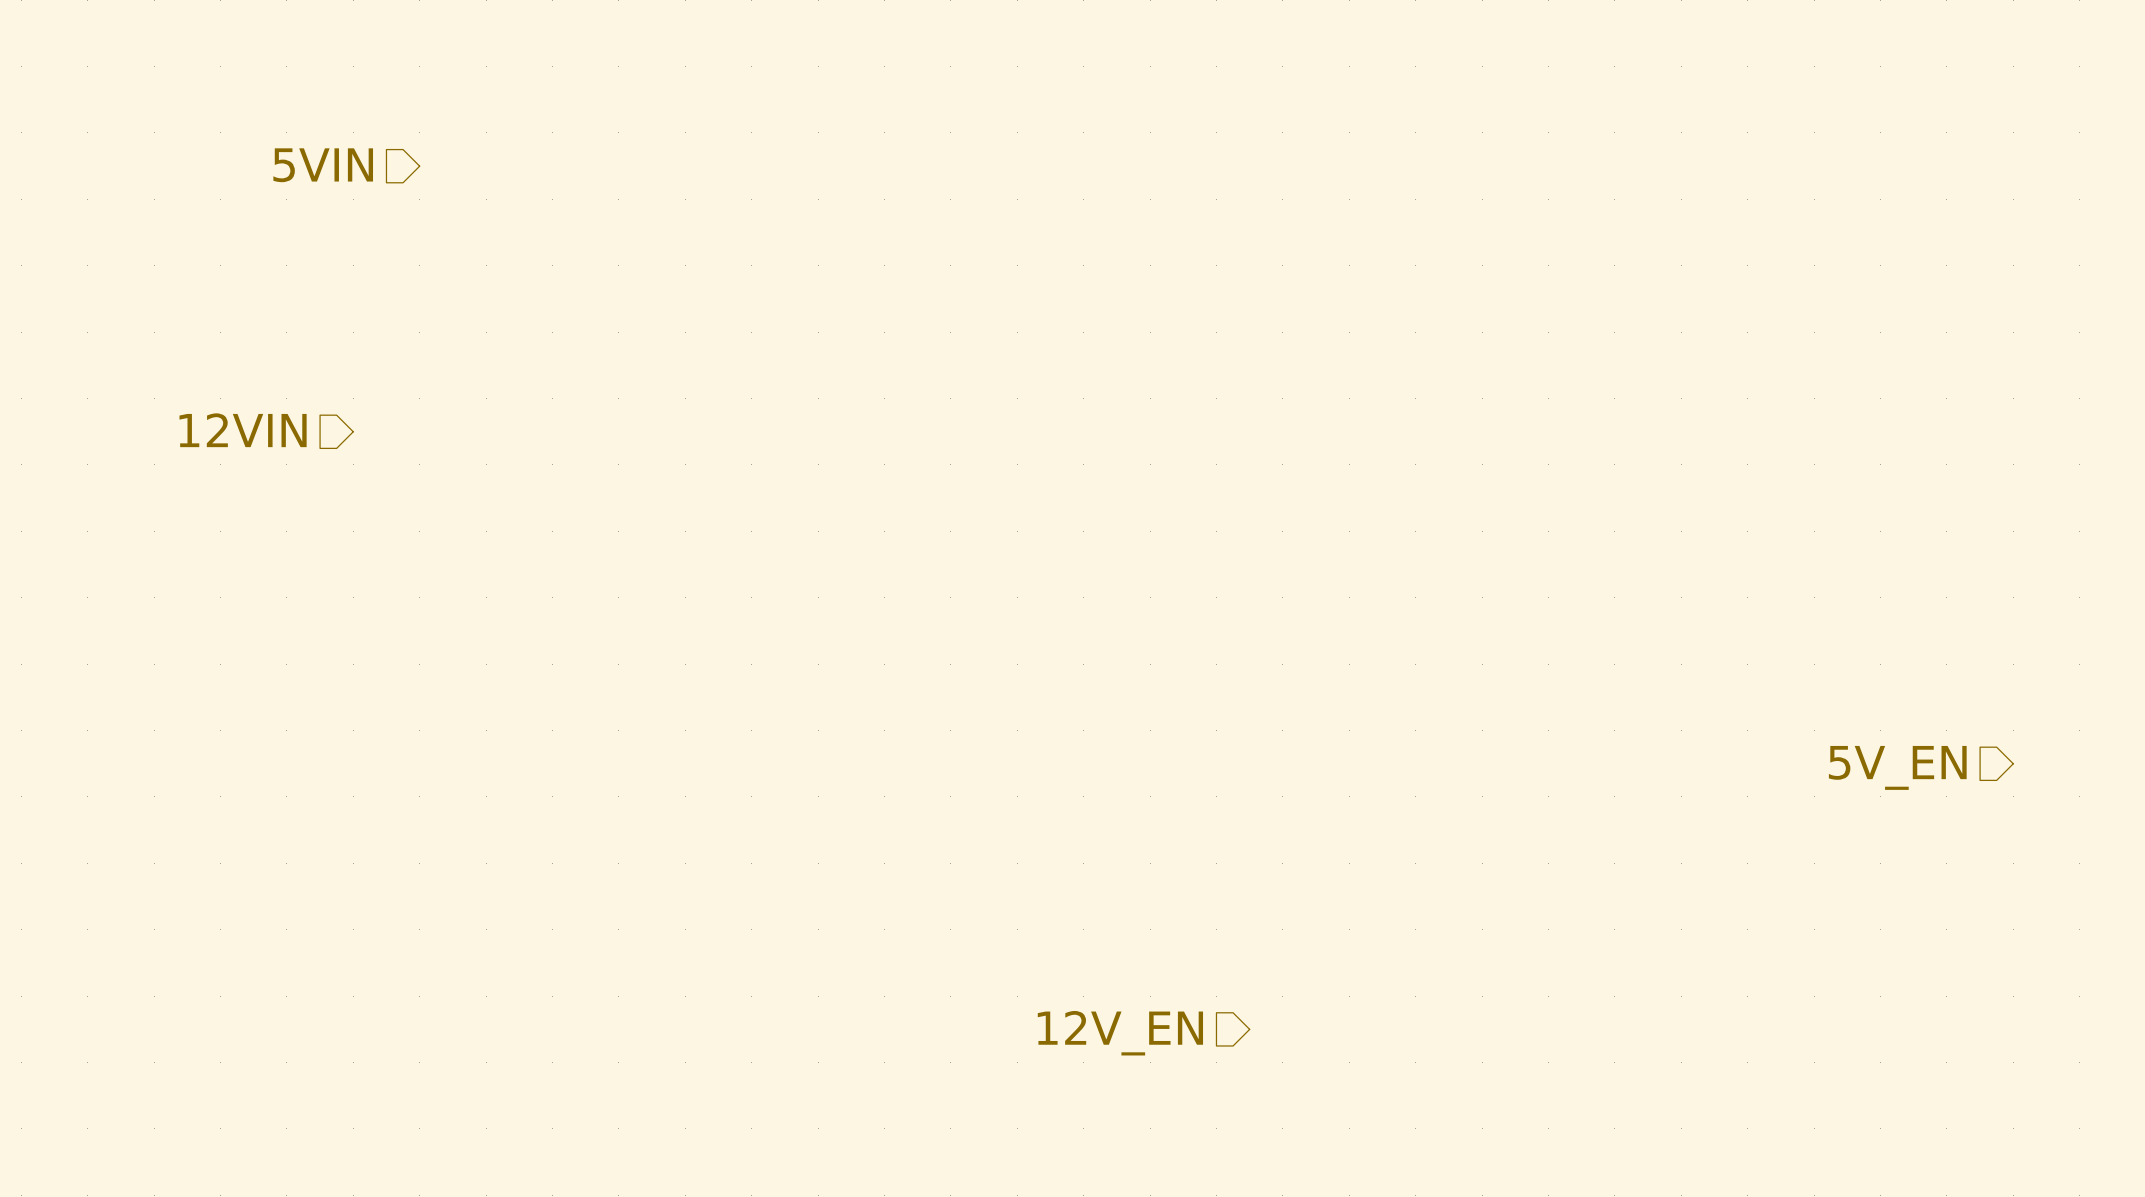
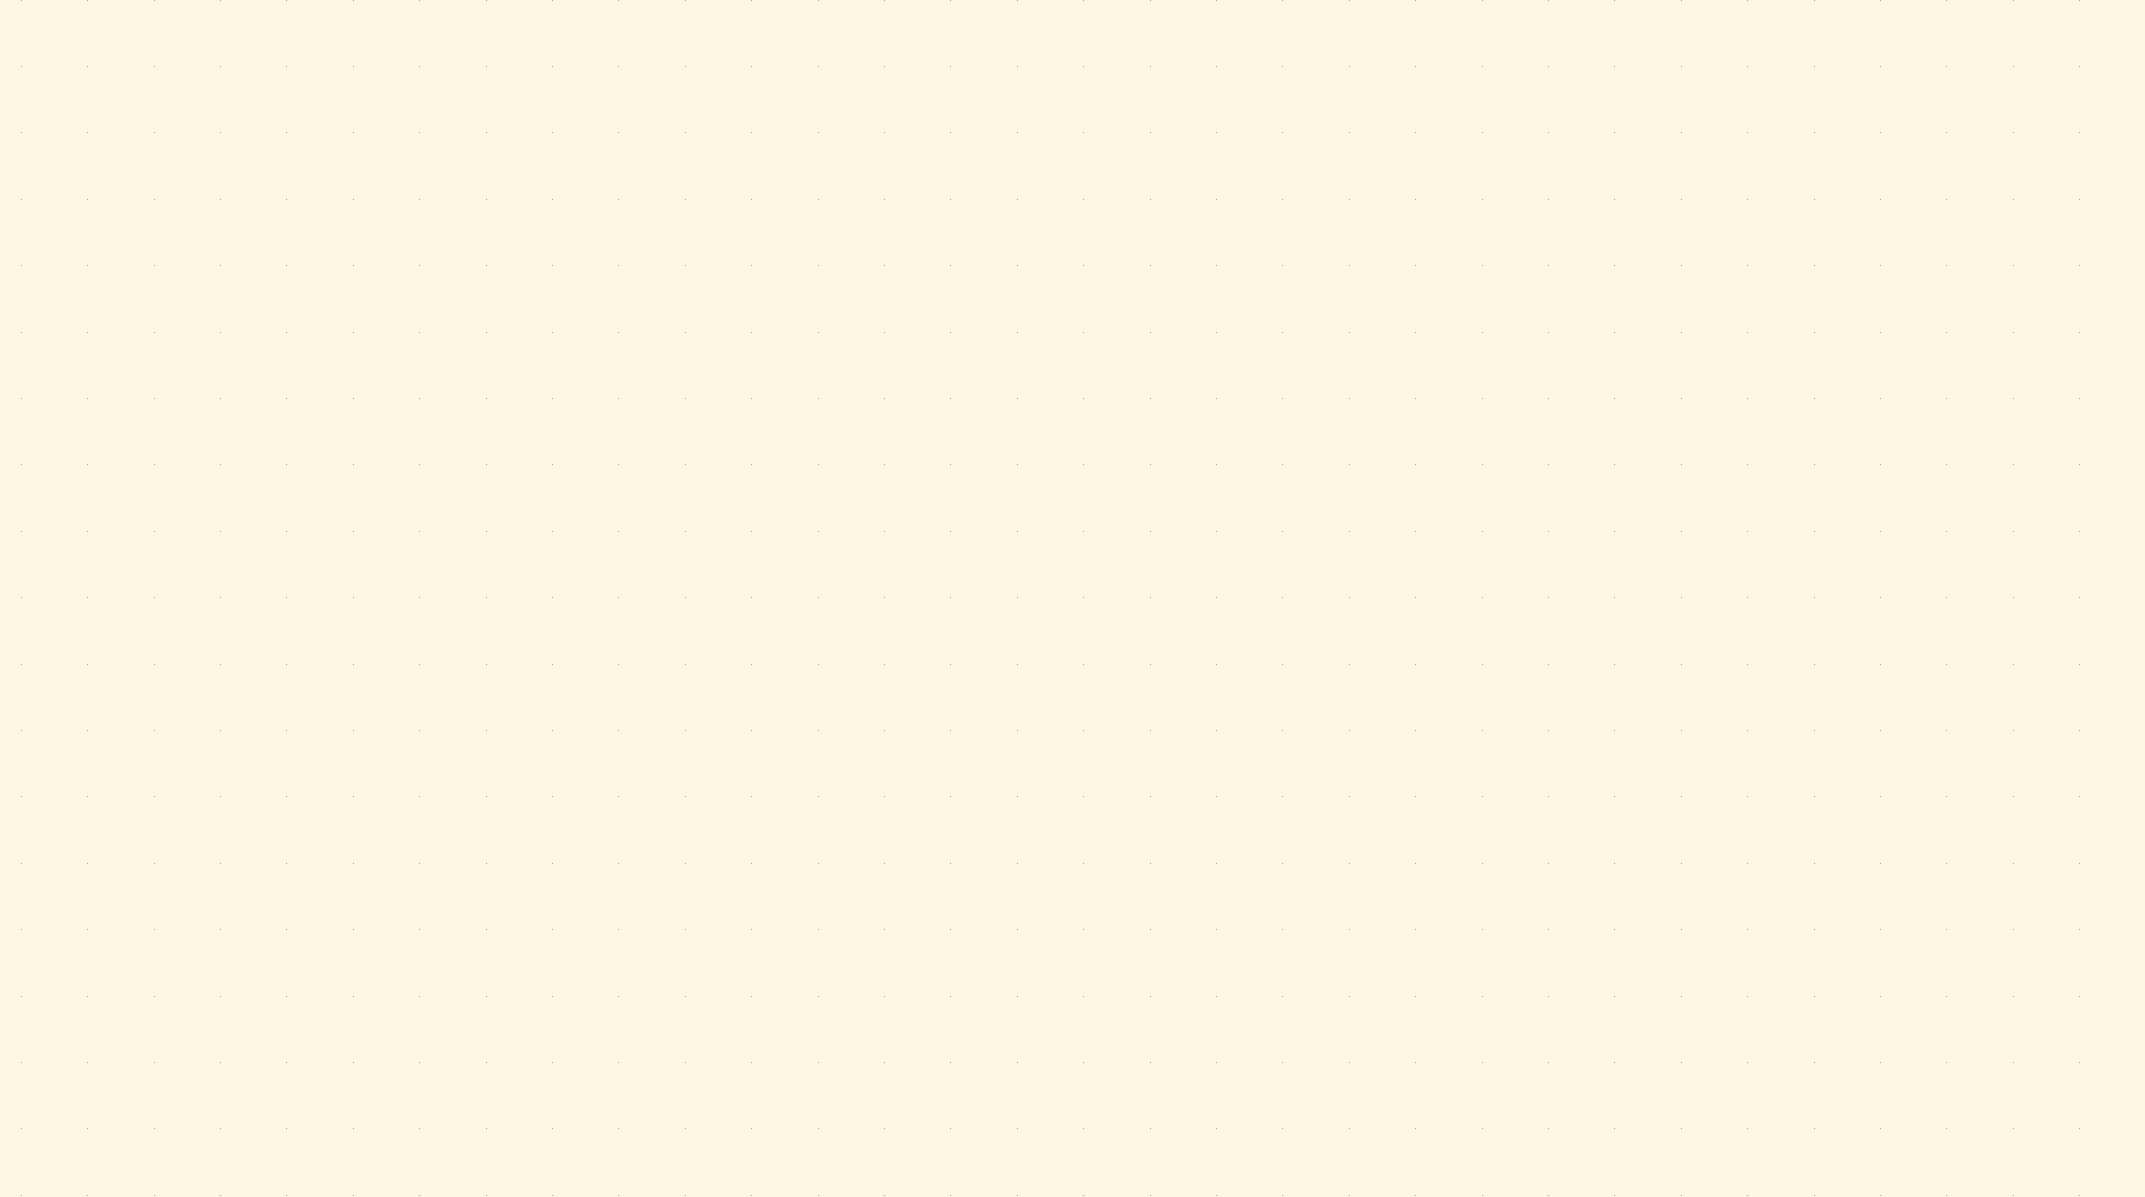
hierarchical label: 5VIN (323, 165) -> none
hierarchical label: 12VIN (243, 430) -> none
hierarchical label: 5V_EN (1897, 767) -> none
hierarchical label: 12V_EN (1120, 1033) -> none

